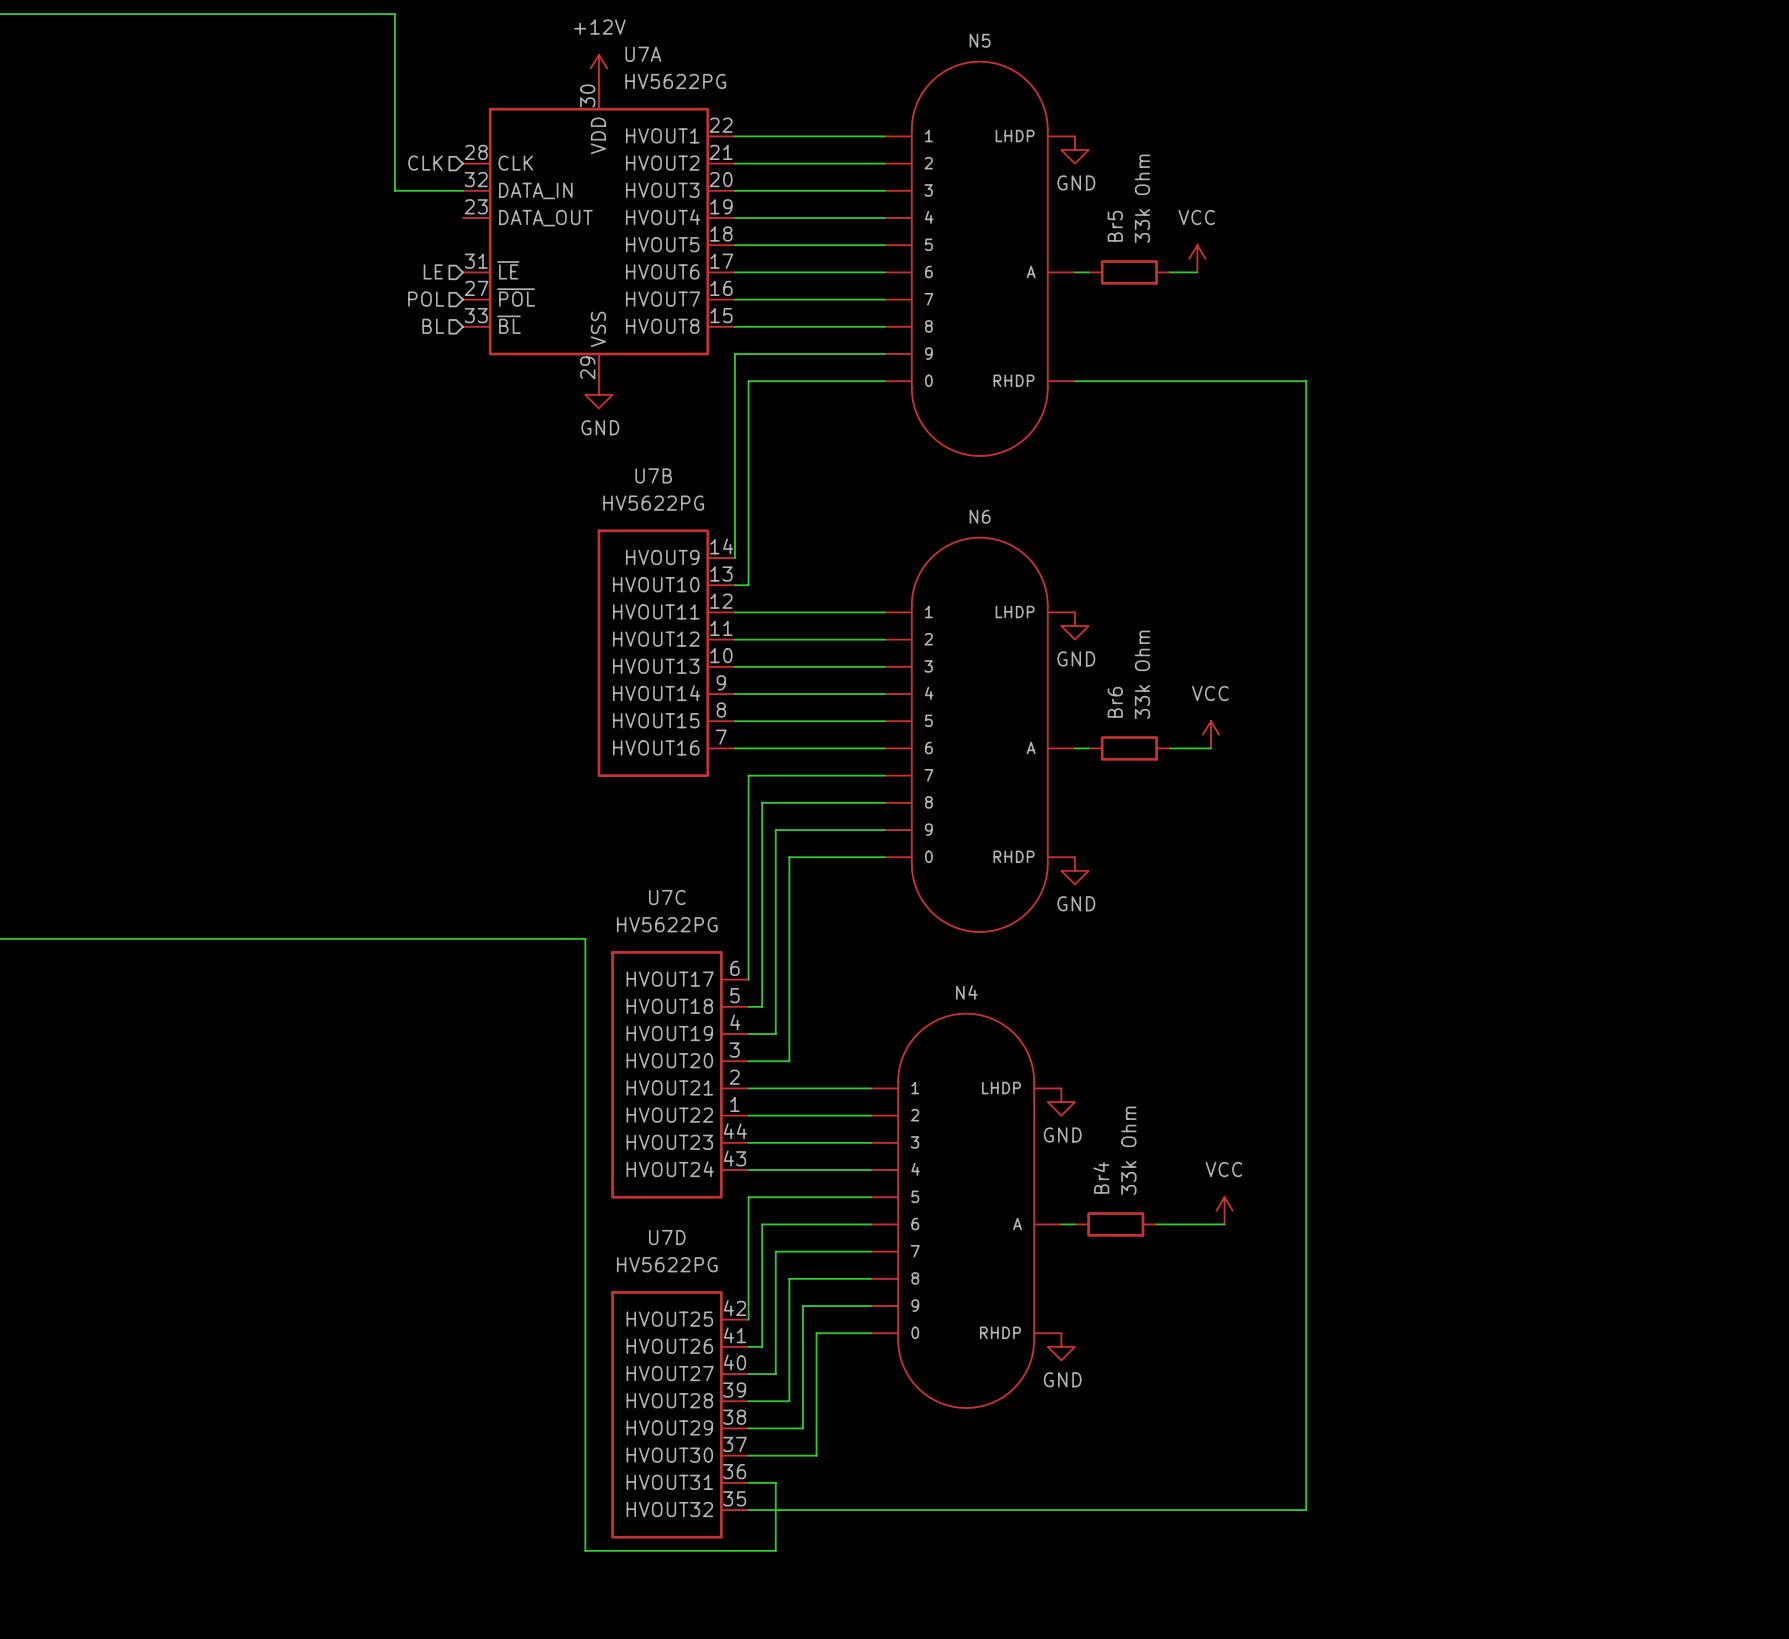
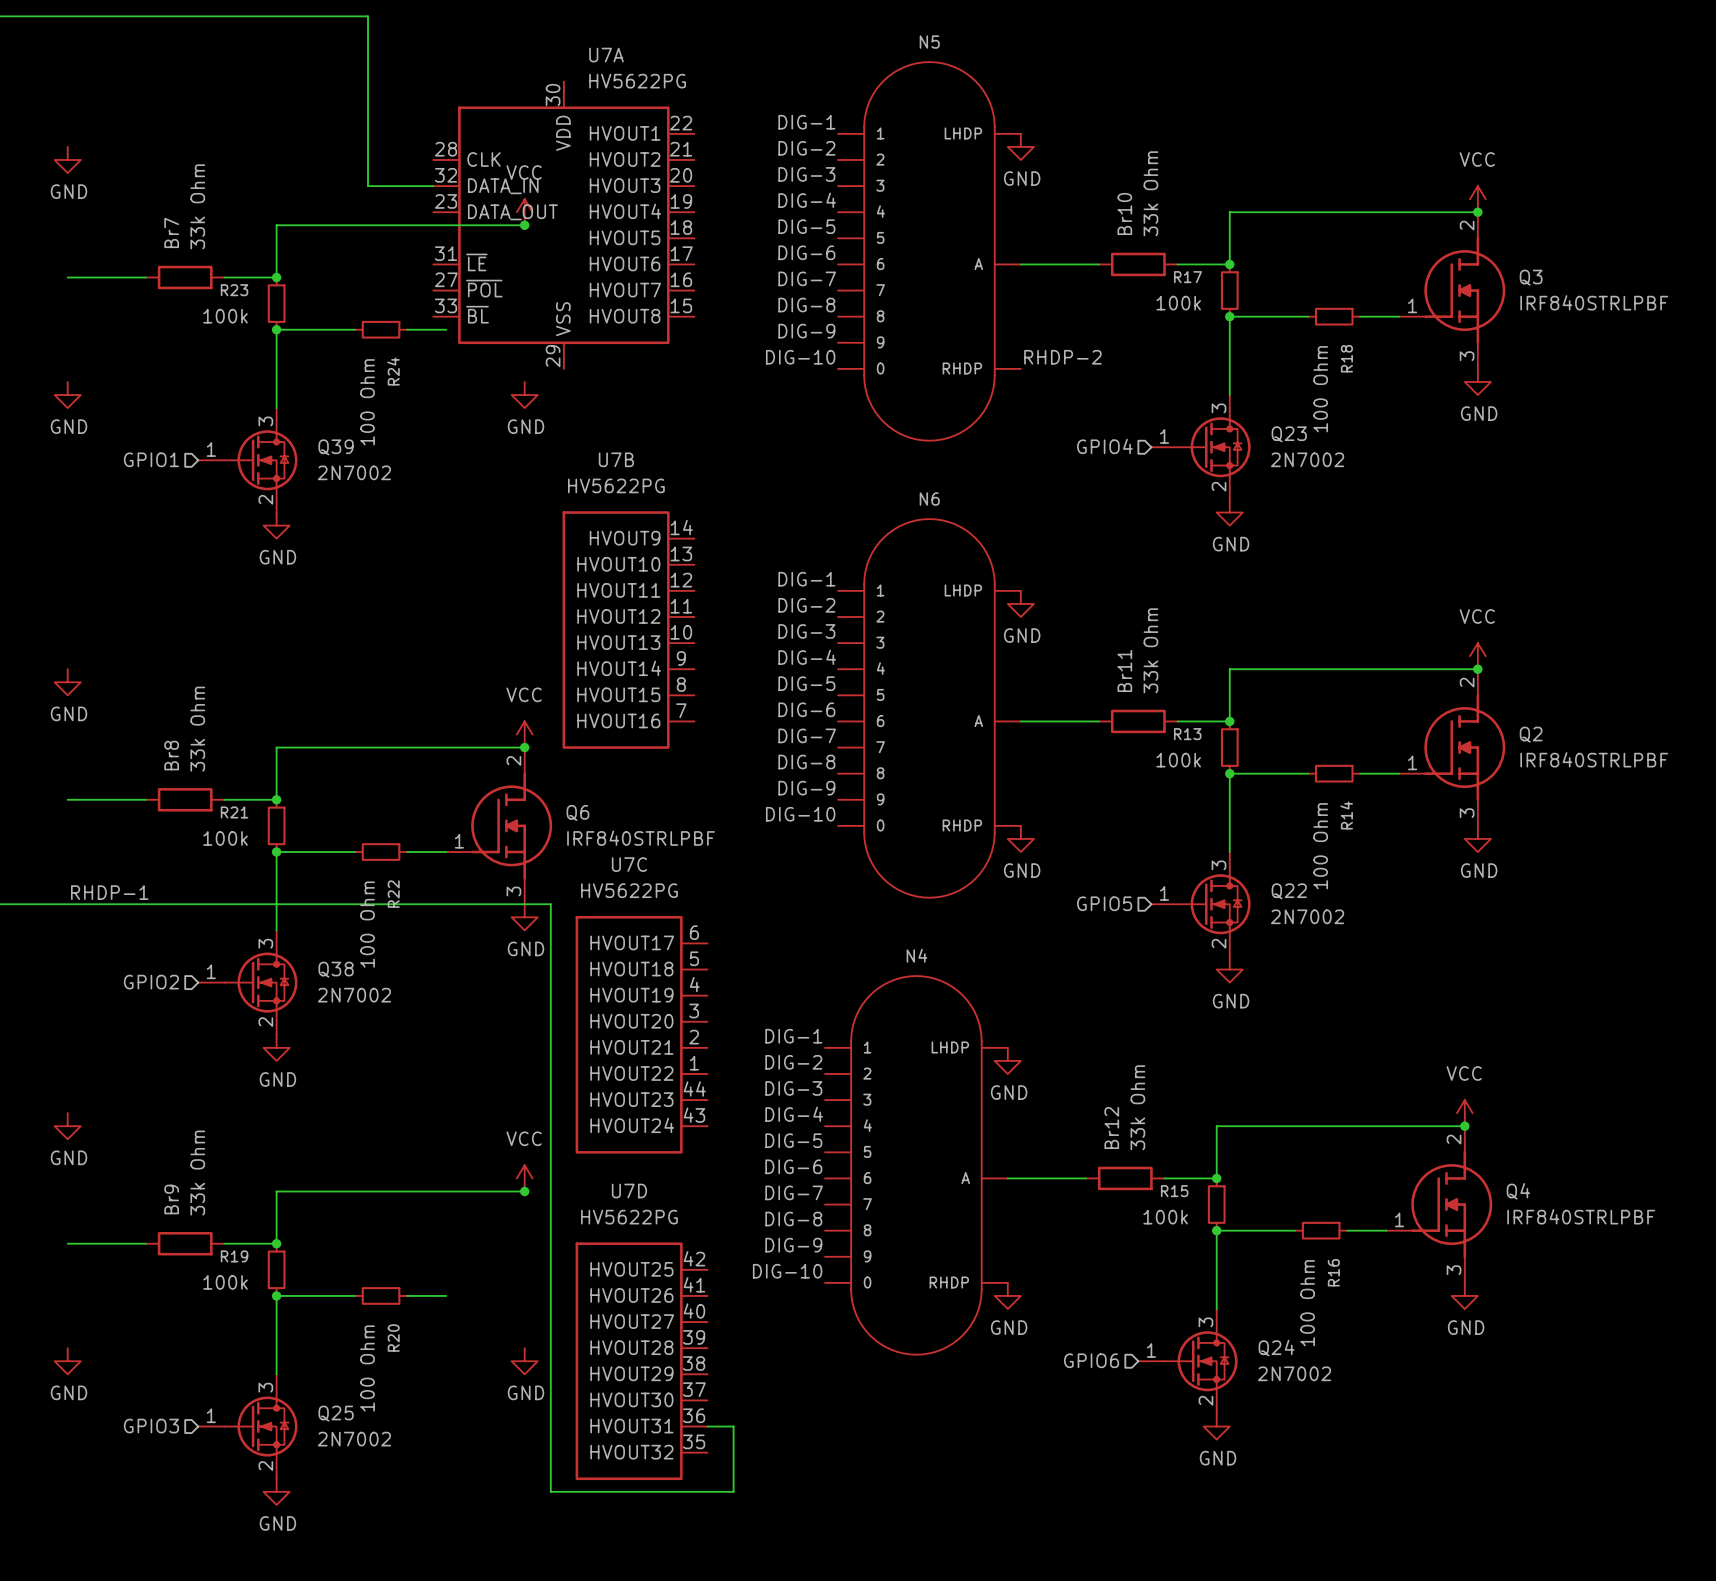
power symbol: +12V (598, 68) -> none
label: none -> DIG-1 (806, 122)
wire: (734, 136) (884, 136) -> none
label: none -> DIG-2 (806, 148)
power symbol: none -> GND (67, 159)
hierarchical label: CLK (425, 163) -> none
wire: (734, 163) (884, 163) -> none
label: none -> DIG-3 (806, 174)
wire: (734, 190) (884, 190) -> none
power symbol: none -> VCC (1477, 199)
label: none -> DIG-4 (807, 200)
power symbol: none -> VCC (524, 212)
wire: (734, 218) (884, 218) -> none
wire: none -> (1477, 212) (1229, 212) (1229, 264) (1177, 264)
junction: none -> (1477, 212)
wire: none -> (524, 225) (276, 225) (276, 277) (224, 277)
junction: none -> (524, 225)
label: none -> DIG-5 (806, 226)
wire: (734, 245) (884, 245) -> none
power symbol: VCC (1197, 258) -> none
label: none -> DIG-6 (806, 252)
hierarchical label: LE (433, 271) -> none
wire: (734, 272) (884, 272) -> none
wire: none -> (1033, 264) (1099, 264)
Br5: 33k Ohm (1129, 272) -> none
wire: (1170, 272) (1197, 272) -> none
Br10: none -> 33k Ohm (1138, 264)
junction: none -> (1229, 264)
wire: none -> (67, 277) (146, 277)
Br7: none -> 33k Ohm (185, 277)
junction: none -> (276, 277)
label: none -> DIG-7 (807, 278)
hierarchical label: POL (426, 299) -> none
wire: (734, 299) (884, 299) -> none
R17: none -> 100k (1229, 290)
Q3: none -> IRF840STRLPBF (1452, 290)
R23: none -> 100k (276, 303)
label: none -> DIG-8 (806, 305)
hierarchical label: BL (433, 326) -> none
wire: (734, 326) (884, 326) -> none
junction: none -> (1229, 316)
wire: none -> (1308, 316) (1229, 316) (1229, 395)
R18: none -> 100 Ohm (1334, 316)
wire: none -> (1360, 316) (1399, 316)
junction: none -> (276, 329)
wire: none -> (354, 329) (276, 329) (276, 408)
R24: none -> 100 Ohm (381, 329)
wire: none -> (407, 329) (446, 329)
label: none -> DIG-9 (806, 331)
wire: (884, 354) (734, 354) (734, 558) -> none
label: none -> DIG-10 (800, 357)
label: none -> RHDP-2 (1062, 357)
wire: (884, 381) (748, 381) (748, 585) (734, 585) -> none
wire: (1074, 381) (1306, 381) (1306, 1510) (748, 1510) -> none
power symbol position: GND (598, 394) -> GND (524, 395)
power symbol: none -> GND (1477, 381)
power symbol: none -> GND (67, 395)
hierarchical label: none -> GPIO4 (1104, 446)
Q23: none -> 2N7002 (1201, 447)
hierarchical label: none -> GPIO1 (151, 459)
Q39: none -> 2N7002 (247, 460)
power symbol: none -> GND (1229, 512)
power symbol: none -> GND (276, 525)
label: none -> DIG-1 (806, 579)
wire: (734, 612) (884, 612) -> none
label: none -> DIG-2 (806, 605)
wire: (734, 639) (884, 639) -> none
label: none -> DIG-3 (806, 631)
wire: (734, 666) (884, 666) -> none
power symbol: none -> VCC (1477, 656)
label: none -> DIG-4 (807, 657)
wire: (734, 694) (884, 694) -> none
wire: none -> (1477, 669) (1229, 669) (1229, 721) (1177, 721)
junction: none -> (1477, 669)
power symbol: none -> GND (67, 682)
label: none -> DIG-5 (806, 683)
wire: (734, 721) (884, 721) -> none
power symbol: VCC (1210, 734) -> none
label: none -> DIG-6 (806, 709)
wire: (734, 748) (884, 748) -> none
wire: none -> (1033, 721) (1099, 721)
Br6: 33k Ohm (1129, 748) -> none
wire: (1170, 748) (1210, 748) -> (1360, 773) (1399, 773)
Br11: none -> 33k Ohm (1138, 721)
junction: none -> (1229, 721)
power symbol: none -> VCC (524, 734)
label: none -> DIG-7 (807, 735)
wire: none -> (524, 747) (276, 747) (276, 799) (224, 799)
junction: none -> (524, 747)
wire: (884, 775) (748, 775) (748, 979) -> none
R13: none -> 100k (1229, 747)
Q2: none -> IRF840STRLPBF (1452, 747)
label: none -> DIG-8 (806, 762)
wire: (884, 802) (762, 802) (762, 1006) (748, 1006) -> none
junction: none -> (1229, 773)
wire: none -> (1308, 773) (1229, 773) (1229, 852)
R14: none -> 100 Ohm (1334, 773)
label: none -> DIG-9 (806, 788)
wire: none -> (67, 799) (146, 799)
Br8: none -> 33k Ohm (185, 799)
junction: none -> (276, 799)
wire: (884, 830) (775, 830) (775, 1034) (748, 1034) -> none
label: none -> DIG-10 (800, 814)
R21: none -> 100k (276, 825)
Q6: none -> IRF840STRLPBF (499, 825)
wire: (884, 857) (789, 857) (789, 1061) (748, 1061) -> none
power symbol: none -> GND (1477, 838)
junction: none -> (276, 852)
wire: none -> (354, 852) (276, 852) (276, 930)
R22: none -> 100 Ohm (381, 852)
wire: none -> (407, 852) (446, 852)
label: none -> RHDP-1 (109, 892)
hierarchical label: none -> GPIO5 (1104, 903)
Q22: none -> 2N7002 (1201, 904)
power symbol: none -> GND (524, 917)
power symbol: none -> GND (1229, 969)
hierarchical label: none -> GPIO2 (151, 982)
Q38: none -> 2N7002 (247, 982)
label: none -> DIG-1 (793, 1036)
power symbol: none -> GND (276, 1047)
wire: (748, 1088) (870, 1088) -> none
label: none -> DIG-2 (793, 1062)
wire: (748, 1115) (870, 1115) -> none
label: none -> DIG-3 (793, 1088)
wire: (748, 1142) (870, 1142) -> none
power symbol: none -> VCC (1464, 1113)
label: none -> DIG-4 (794, 1114)
power symbol: none -> GND (67, 1126)
wire: (748, 1170) (870, 1170) -> none
junction: none -> (1464, 1126)
label: none -> DIG-5 (793, 1140)
wire: (870, 1197) (748, 1197) (748, 1319) -> none
power symbol: VCC (1224, 1210) -> none
label: none -> DIG-6 (793, 1166)
power symbol: none -> VCC (524, 1178)
wire: (870, 1224) (762, 1224) (762, 1346) (748, 1346) -> none
wire: none -> (1020, 1178) (1086, 1178)
Br4: 33k Ohm (1115, 1224) -> none
wire: (1156, 1224) (1224, 1224) -> (1464, 1126) (1216, 1126) (1216, 1178) (1164, 1178)
Br12: none -> 33k Ohm (1125, 1178)
junction: none -> (1216, 1178)
wire: none -> (524, 1191) (276, 1191) (276, 1243) (224, 1243)
junction: none -> (524, 1191)
label: none -> DIG-7 (794, 1192)
wire: (870, 1251) (775, 1251) (775, 1374) (748, 1374) -> none
R15: none -> 100k (1216, 1204)
Q4: none -> IRF840STRLPBF (1439, 1204)
label: none -> DIG-8 (793, 1219)
wire: (870, 1278) (789, 1278) (789, 1401) (748, 1401) -> none
junction: none -> (1216, 1230)
wire: none -> (1295, 1230) (1216, 1230) (1216, 1309)
R16: none -> 100 Ohm (1321, 1230)
wire: none -> (1347, 1230) (1386, 1230)
wire: none -> (67, 1243) (146, 1243)
Br9: none -> 33k Ohm (185, 1243)
junction: none -> (276, 1243)
label: none -> DIG-9 (793, 1245)
wire: (870, 1306) (802, 1306) (802, 1428) (748, 1428) -> none
R19: none -> 100k (276, 1269)
label: none -> DIG-10 (787, 1271)
wire: (870, 1333) (816, 1333) (816, 1455) (748, 1455) -> none
junction: none -> (276, 1295)
wire: none -> (354, 1295) (276, 1295) (276, 1374)
R20: none -> 100 Ohm (381, 1295)
wire: none -> (407, 1295) (446, 1295)
power symbol: none -> GND (1464, 1295)
power symbol: none -> GND (67, 1361)
power symbol: none -> GND (524, 1361)
hierarchical label: none -> GPIO6 (1091, 1360)
Q24: none -> 2N7002 (1187, 1361)
hierarchical label: none -> GPIO3 (151, 1426)
Q25: none -> 2N7002 (247, 1426)
power symbol: none -> GND (1216, 1426)
power symbol: none -> GND (276, 1491)

